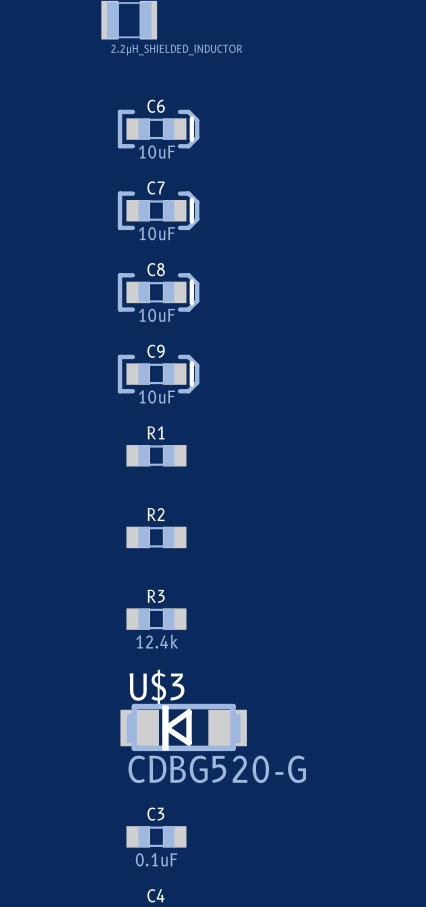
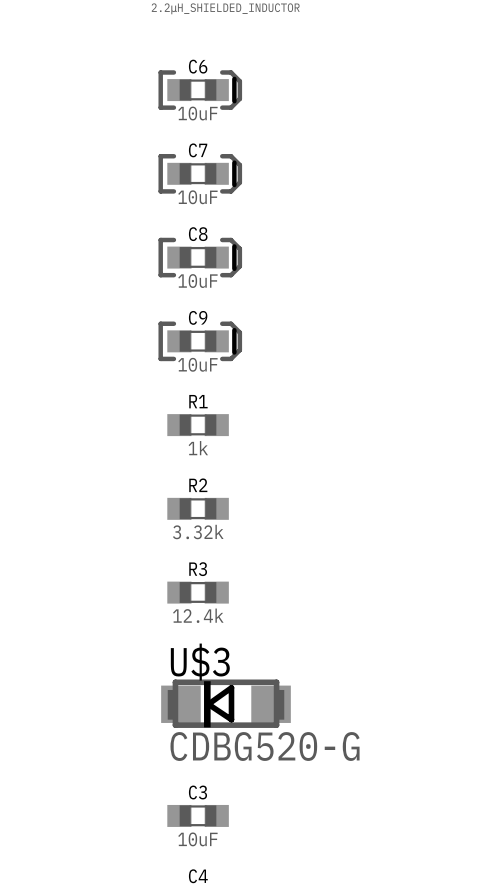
R1 value: none -> 1k (198, 448)
R2 value: none -> 3.32k (198, 532)
C3 value: 0.1uF (156, 859) -> 10uF (197, 839)

